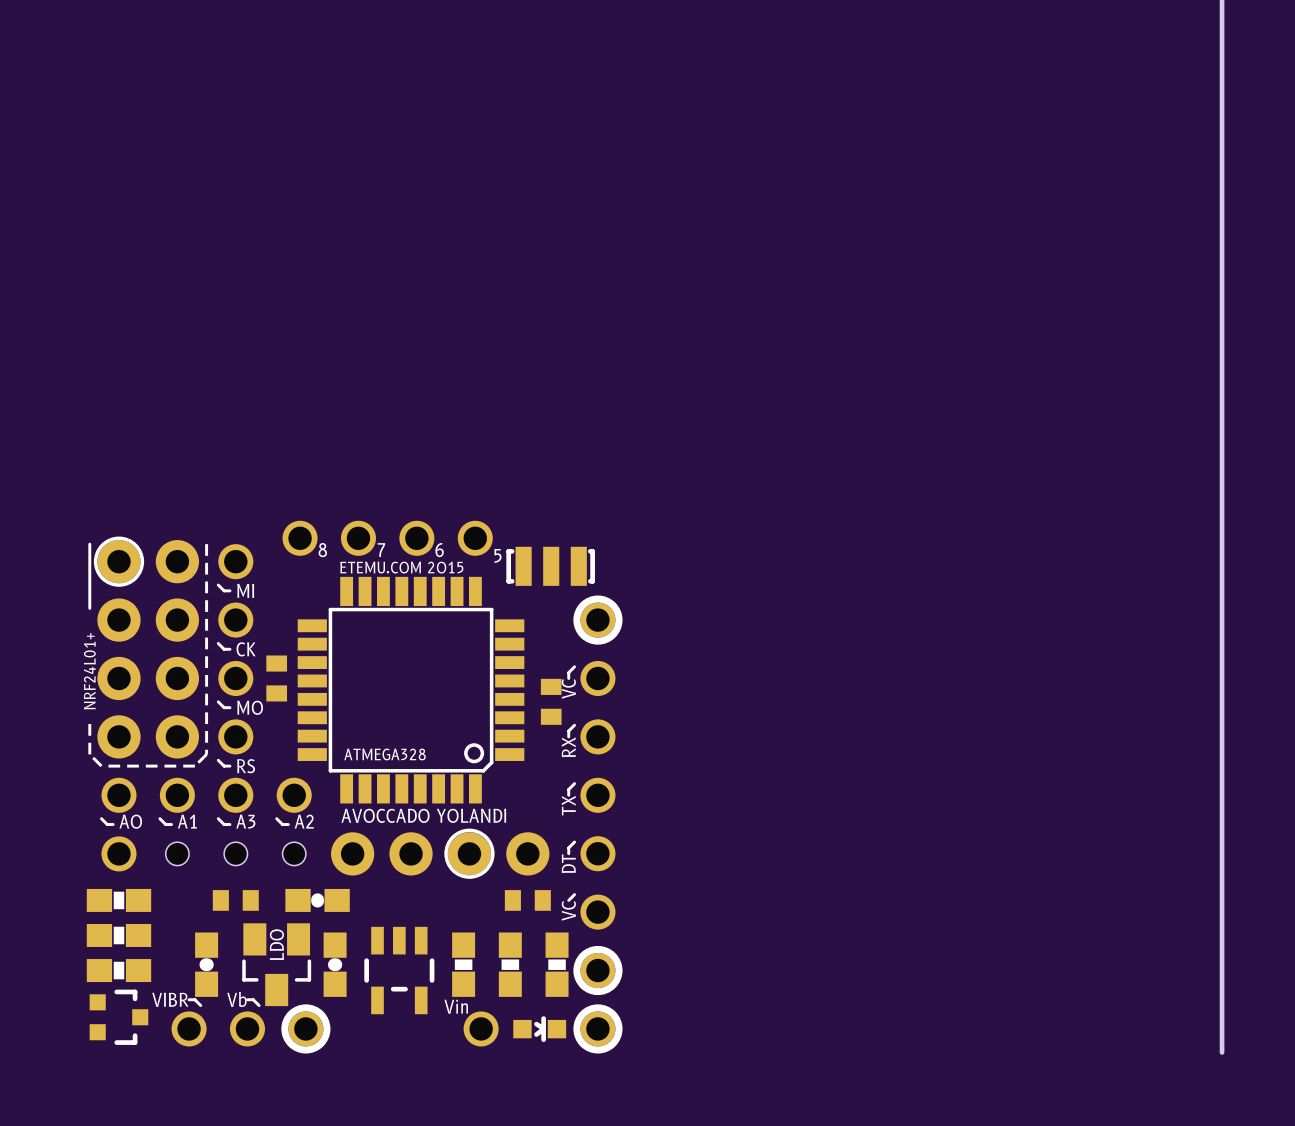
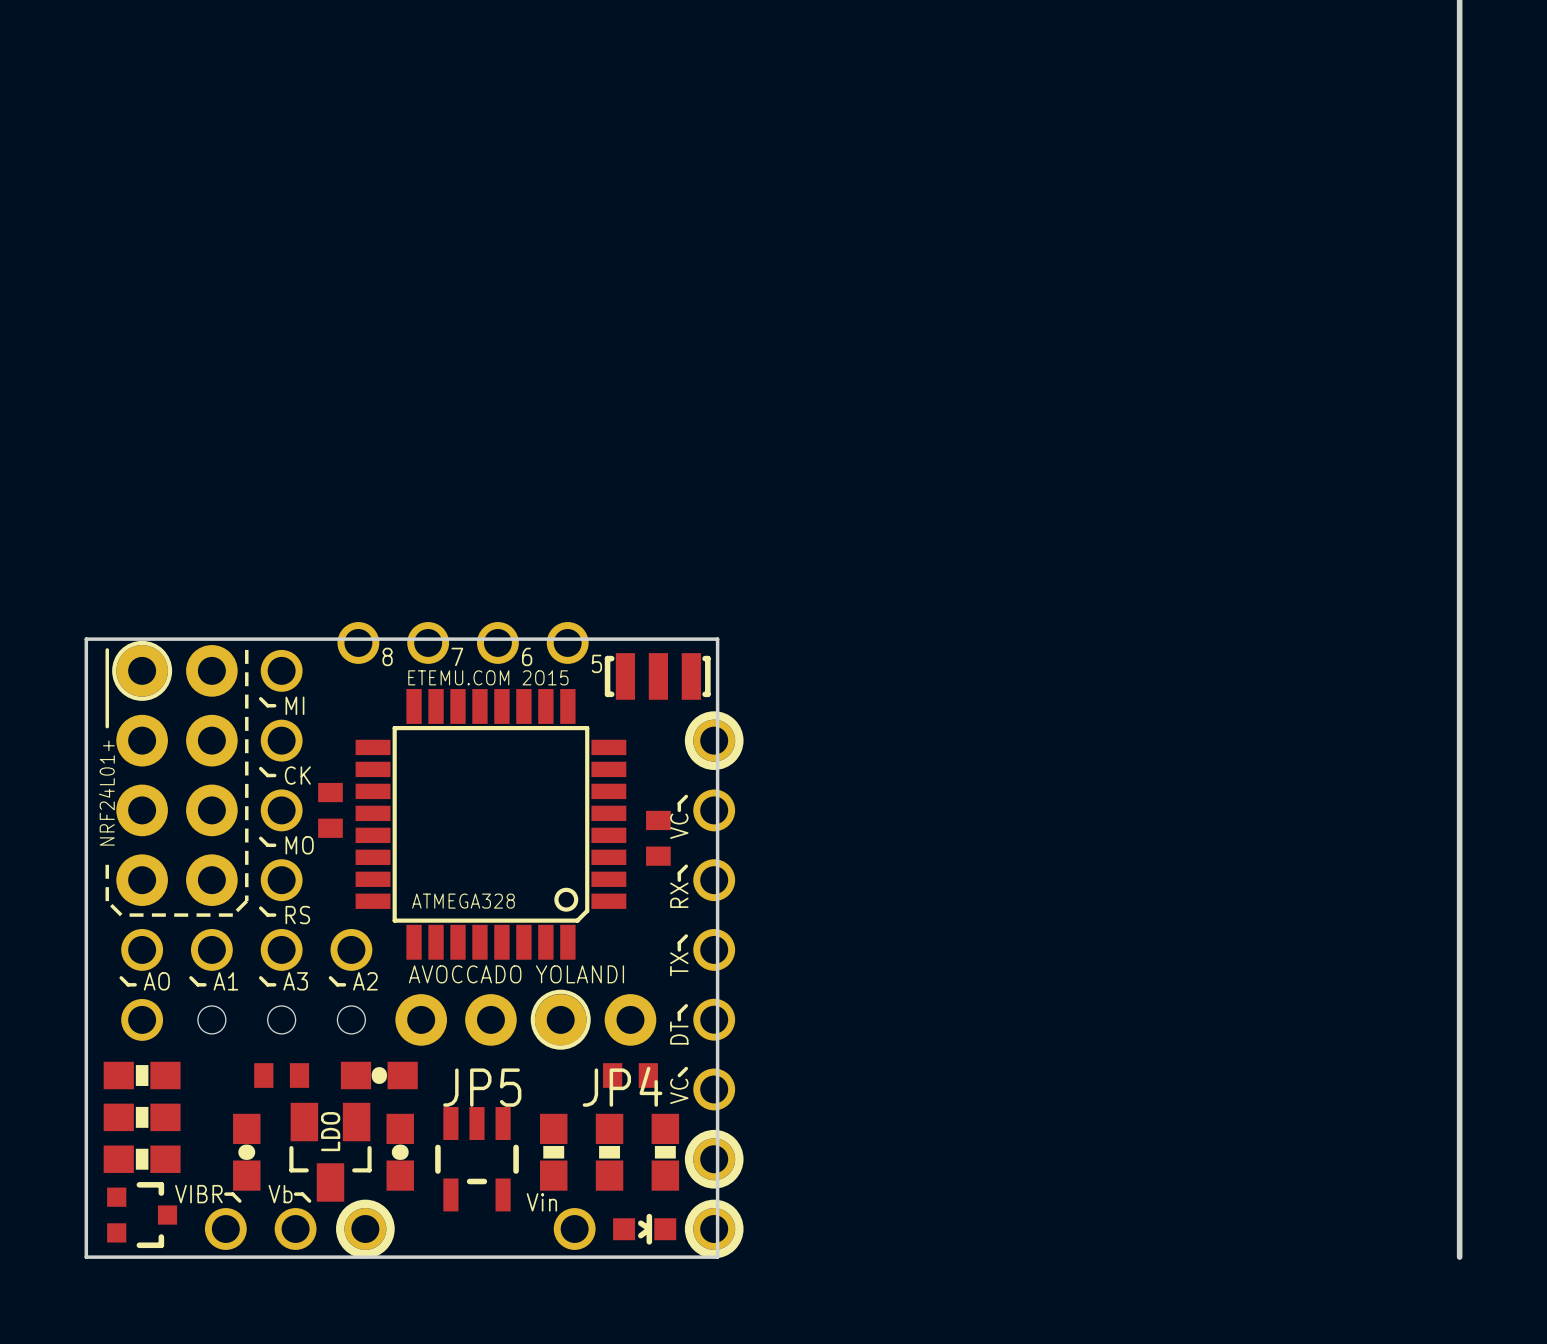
board edge: none -> (86, 639) (717, 639) (717, 1257) (86, 1257) (86, 639)
JP5 name: none -> JP5 (482, 1087)
JP4 name: none -> JP4 (622, 1086)

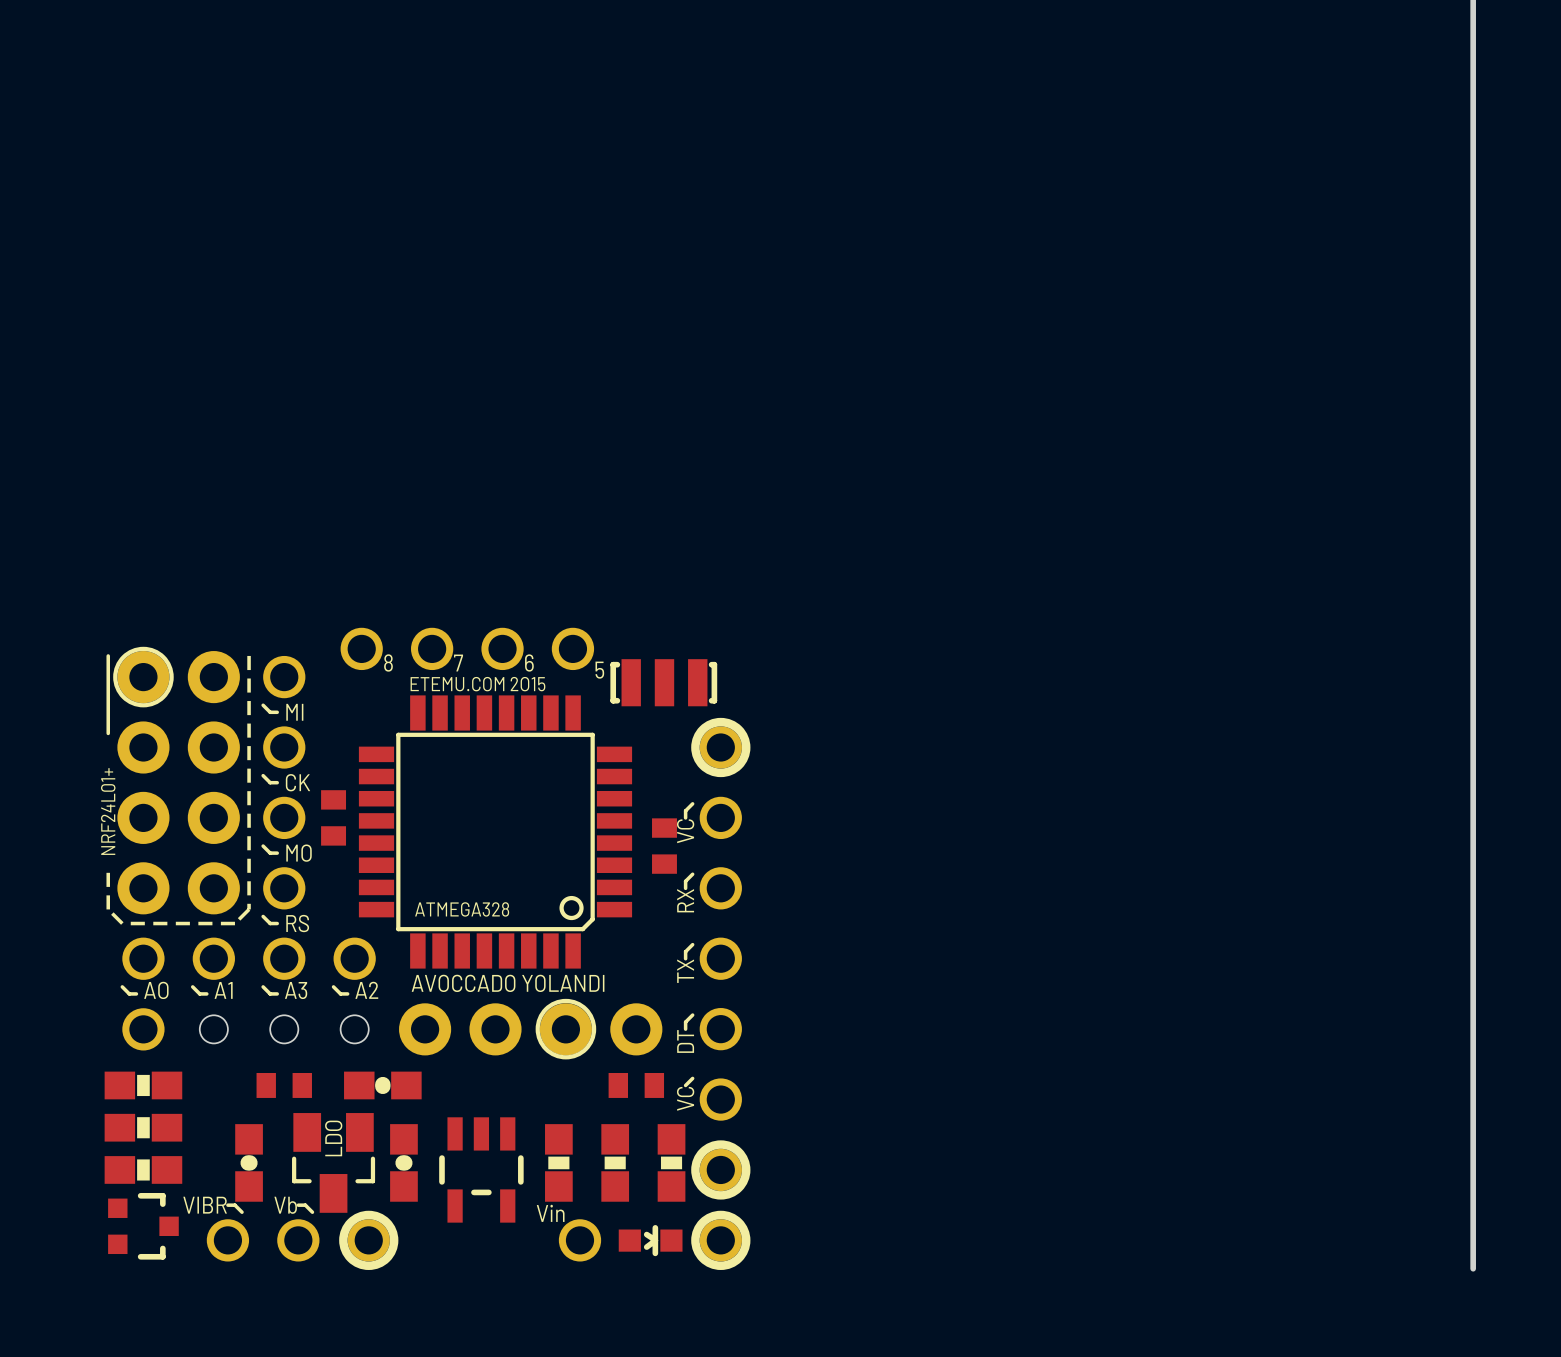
board edge: (86, 639) (717, 639) (717, 1257) (86, 1257) (86, 639) -> none
JP4 name: JP4 (622, 1086) -> none
JP5 name: JP5 (482, 1087) -> none

